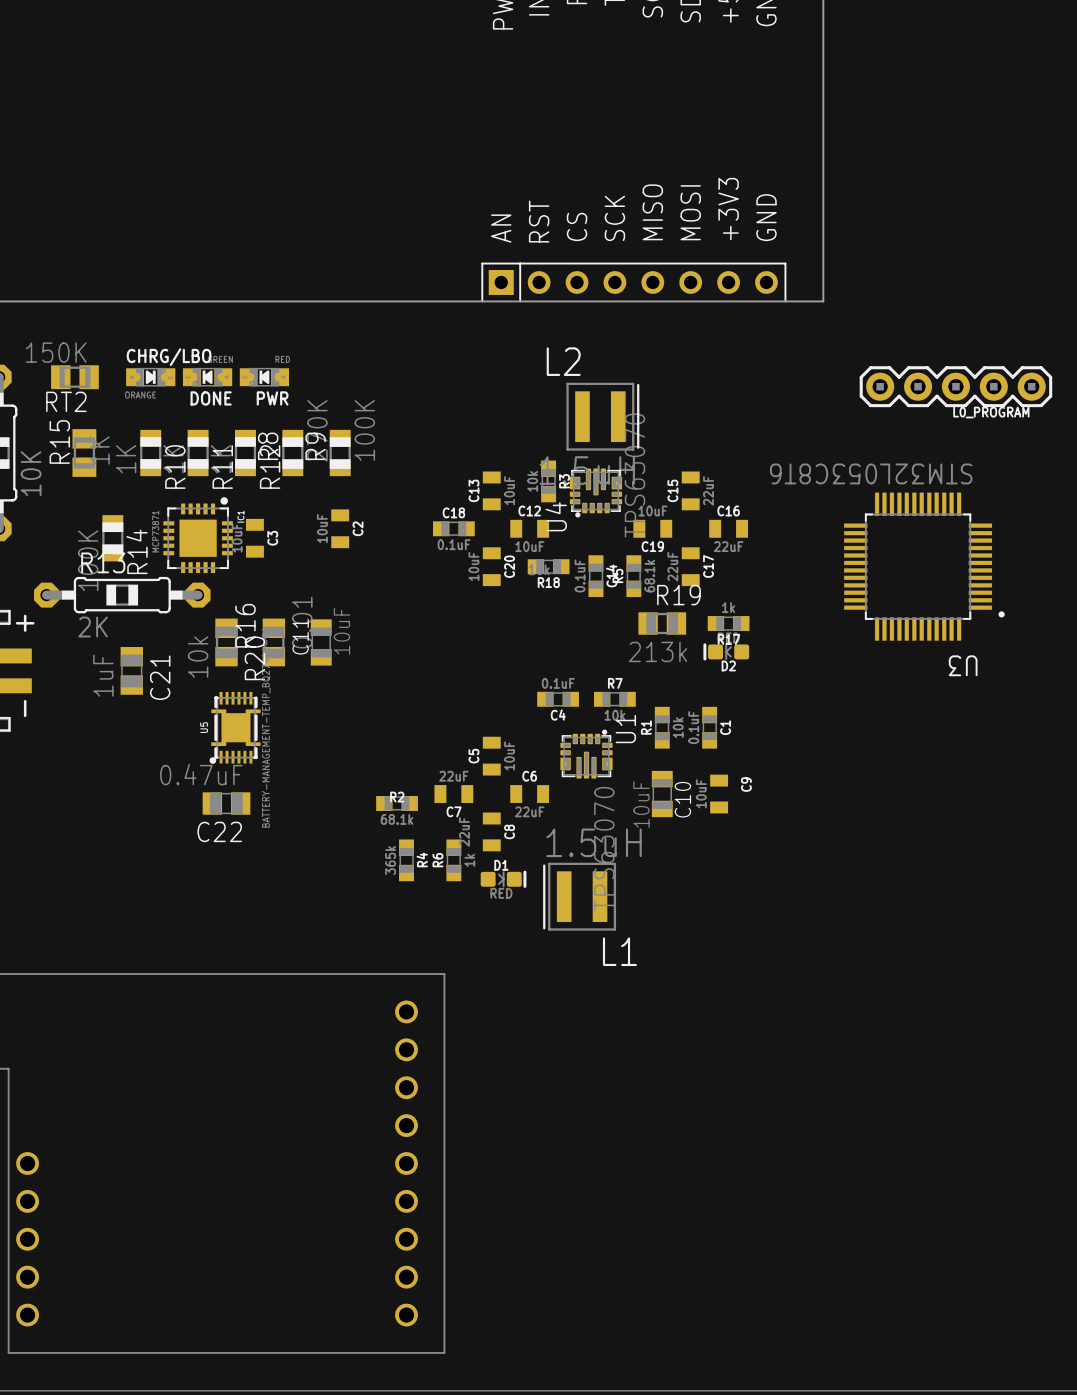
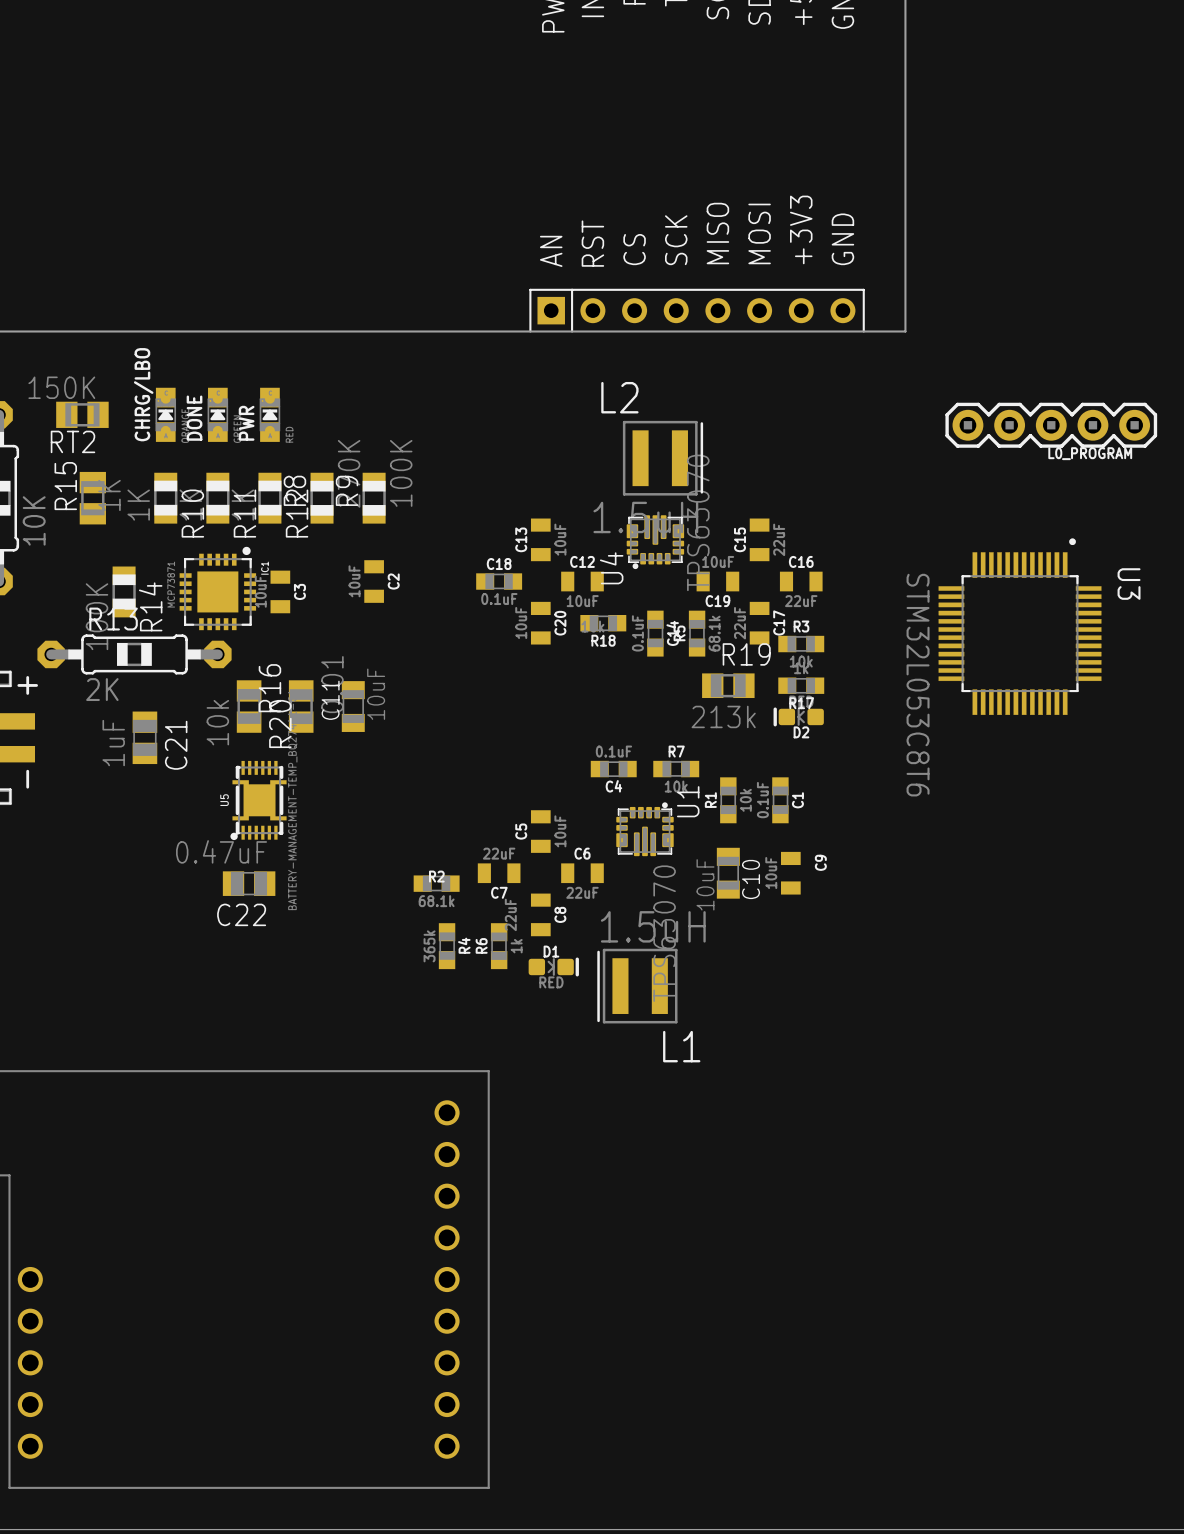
CHRG/LBO rotation: 0° (150, 377) -> 90° counterclockwise (165, 414)
DONE rotation: 0° (207, 377) -> 90° clockwise (217, 414)
PWR rotation: 0° (264, 377) -> 90° clockwise (269, 414)
R3 rotation: 0° (548, 481) -> 90° clockwise (801, 644)
R3 position: (548, 481) -> (801, 644)
U3 rotation: 0° (924, 566) -> 90° counterclockwise (1020, 626)

